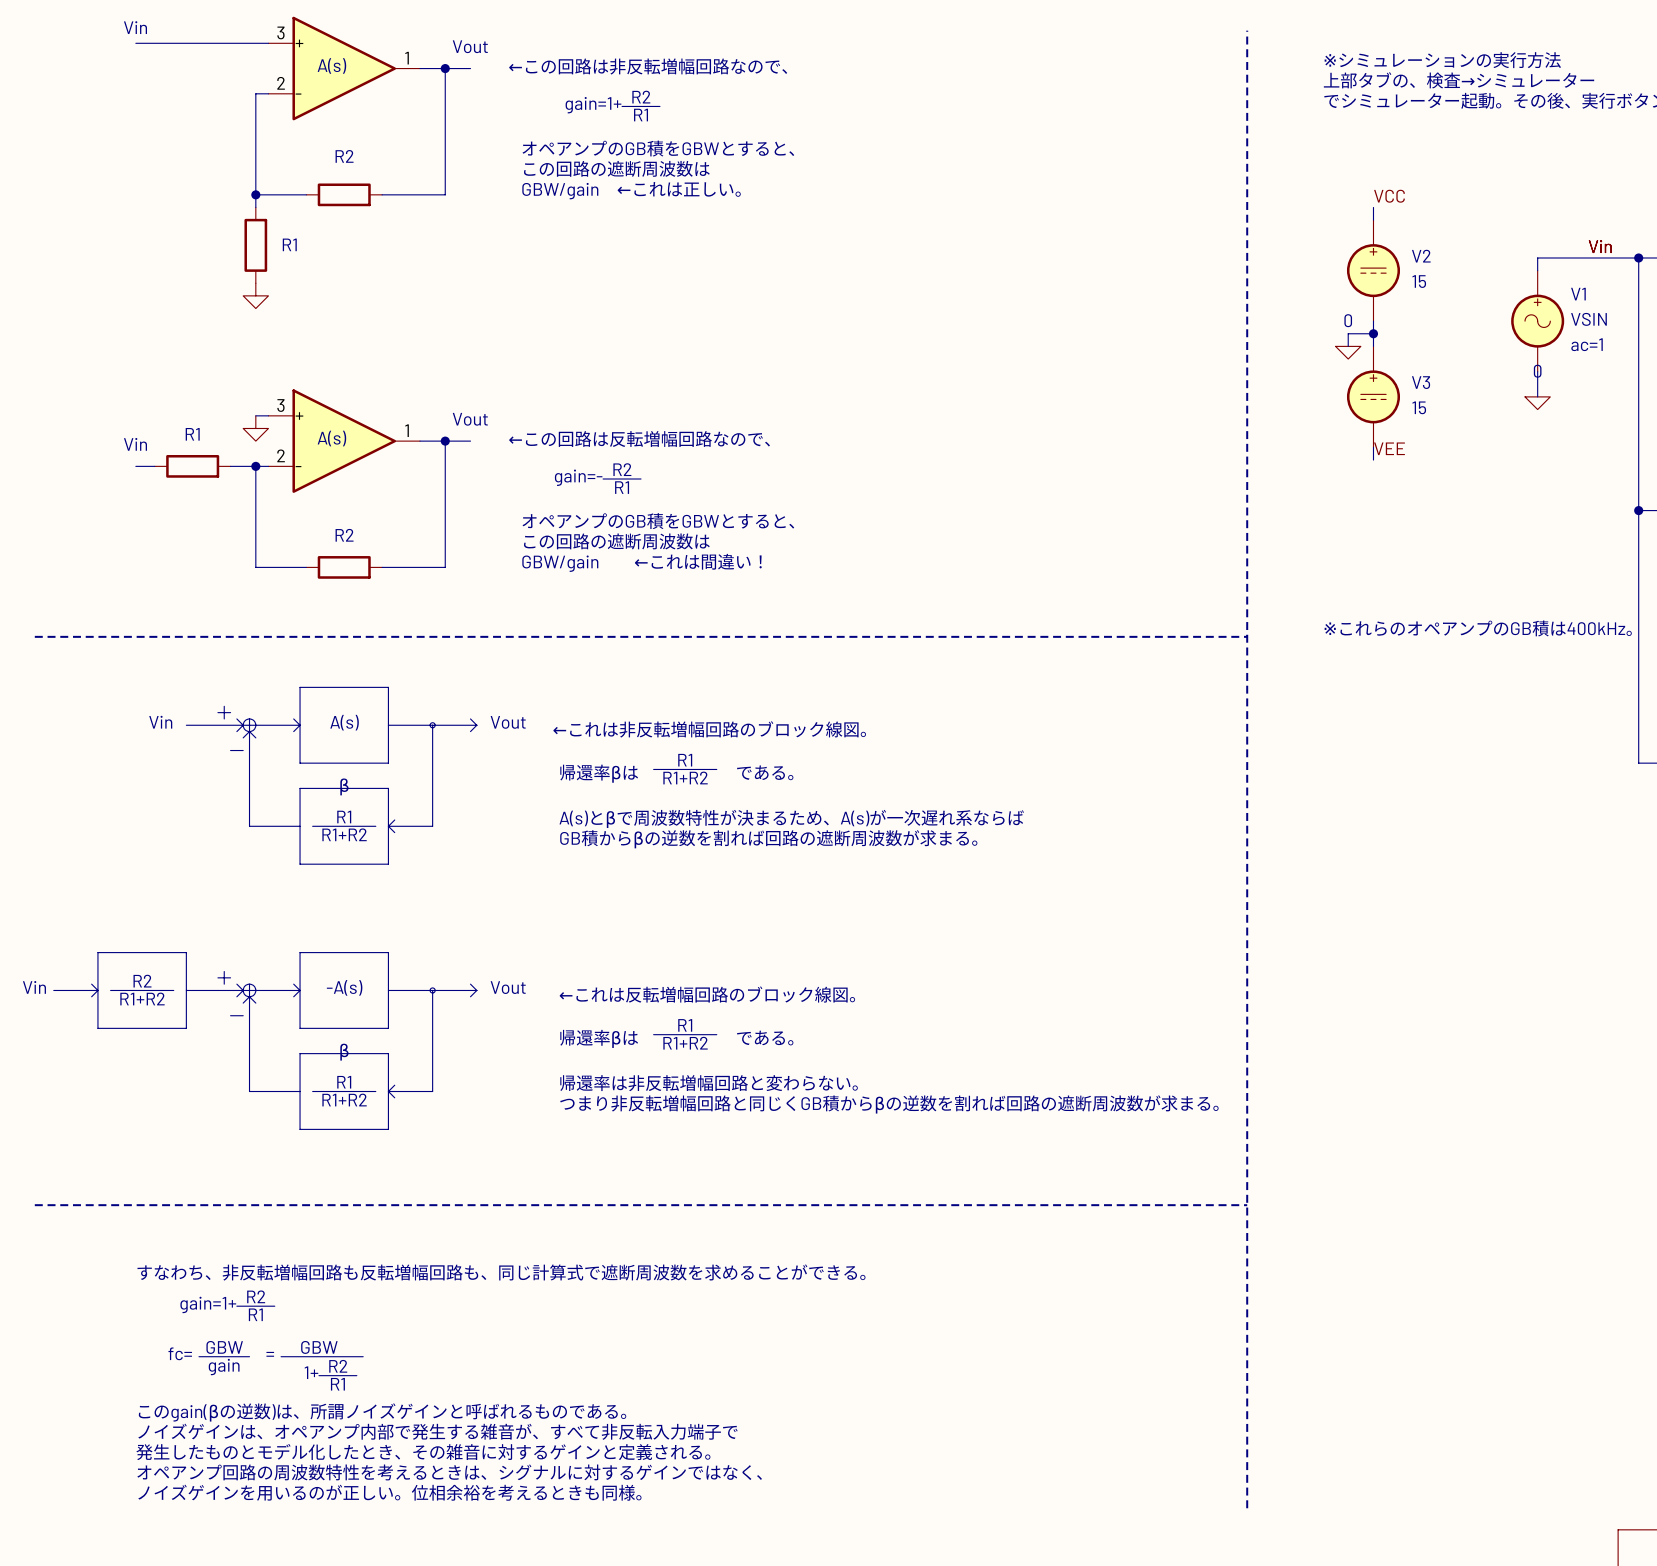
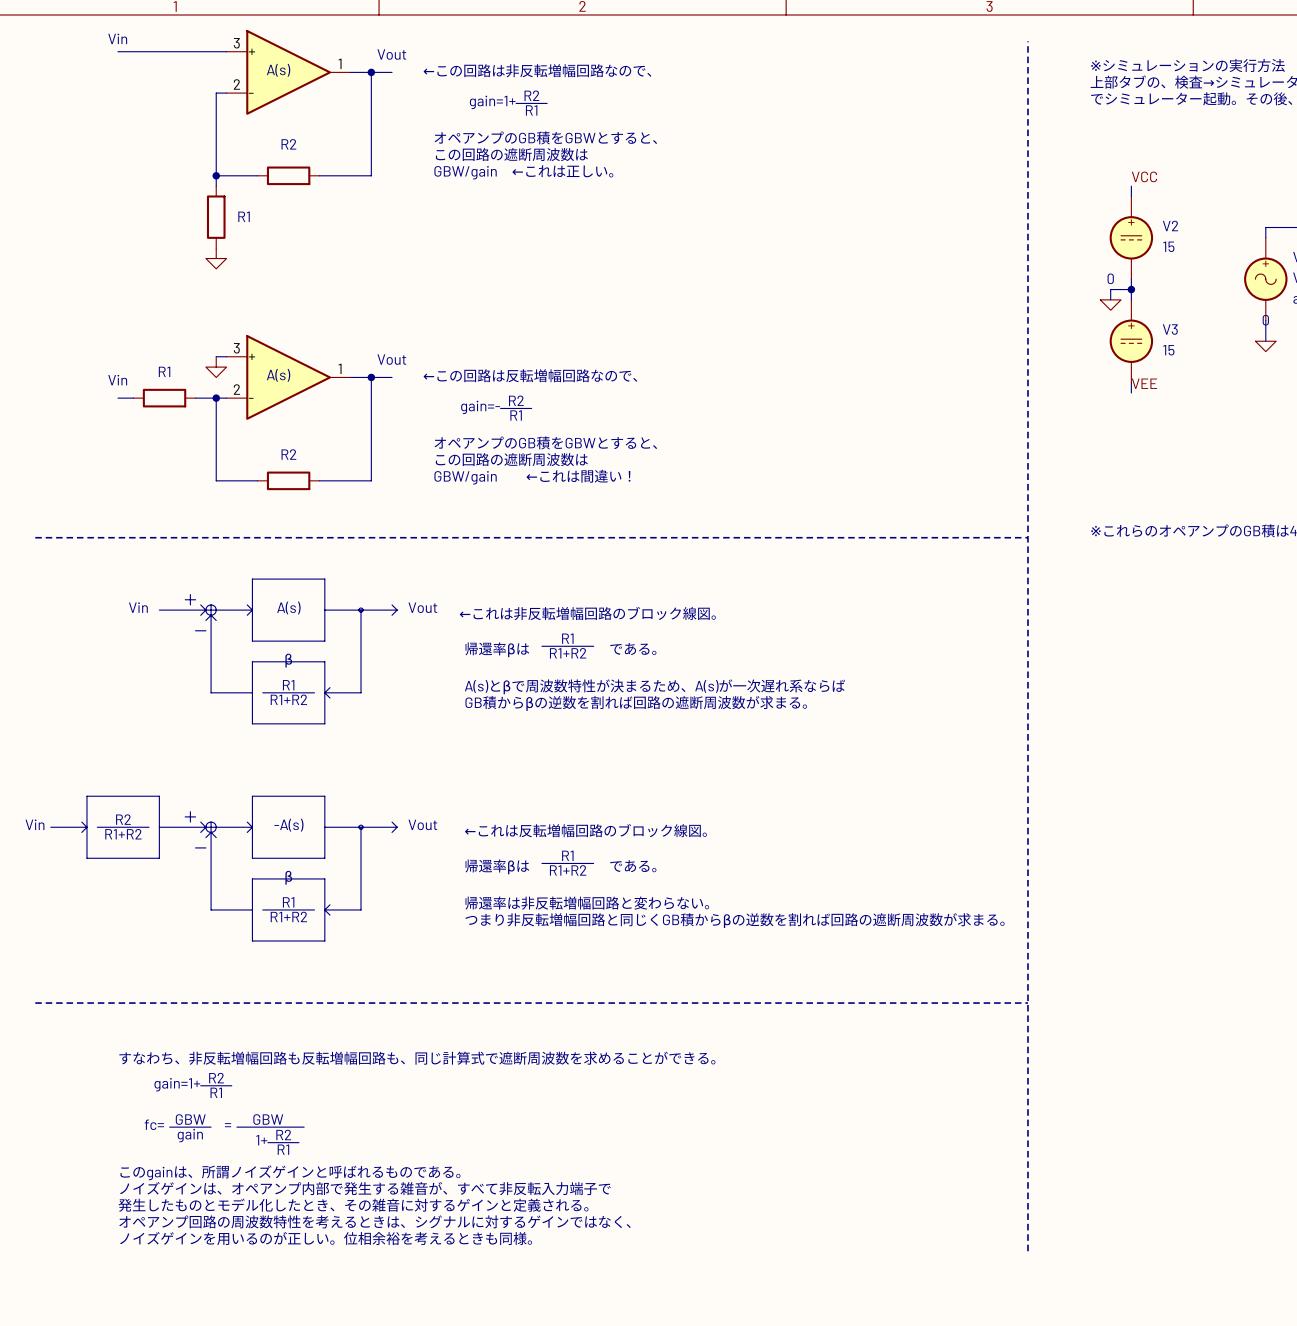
text: このgain(βの逆数)は、所謂ノイズゲインと呼ばれるものである。 (382, 1412) -> このgainは、所謂ノイズゲインと呼ばれるものである。 (290, 1172)

